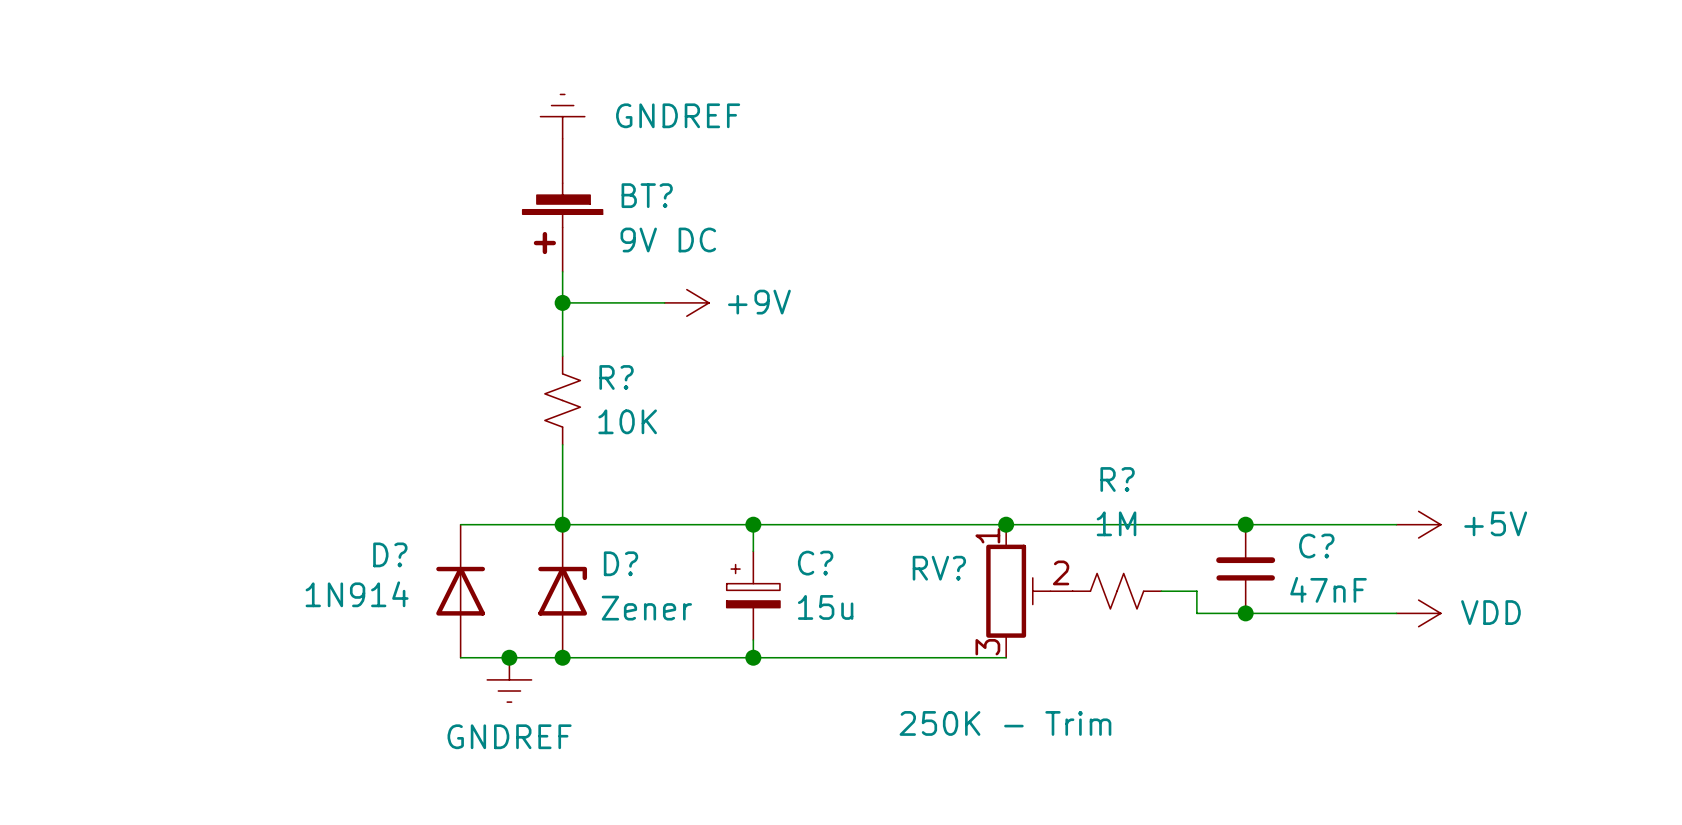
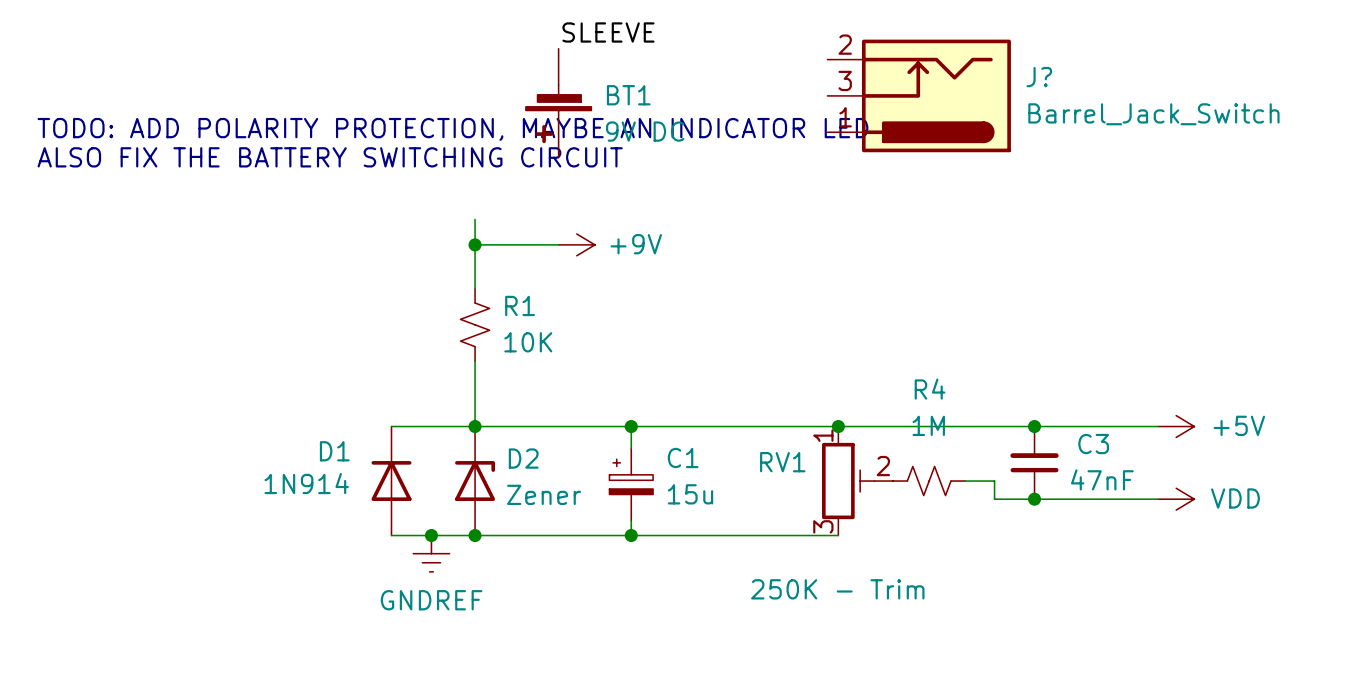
label: none -> SLEEVE (608, 32)
power symbol: GNDREF (562, 116) -> none
J?: none -> Barrel_Jack_Switch (919, 95)
BT1: none -> 9V DC (558, 103)
text: none -> TODO: ADD POLARITY PROTECTION, MAYBE AN INDICATOR LED (452, 129)
text: none -> ALSO FIX THE BATTERY SWITCHING CIRCUIT (330, 157)
BT?: 9V DC (562, 205) -> none
R? name: R? (616, 377) -> R1 (520, 305)
R? name: R? (1117, 479) -> R4 (930, 389)
C? name: C? (1316, 546) -> C3 (1093, 444)
D? name: D? (390, 554) -> D1 (334, 451)
D? name: D? (620, 563) -> D2 (523, 458)
C? name: C? (815, 563) -> C1 (683, 458)
RV? name: RV? (939, 568) -> RV1 (782, 462)

